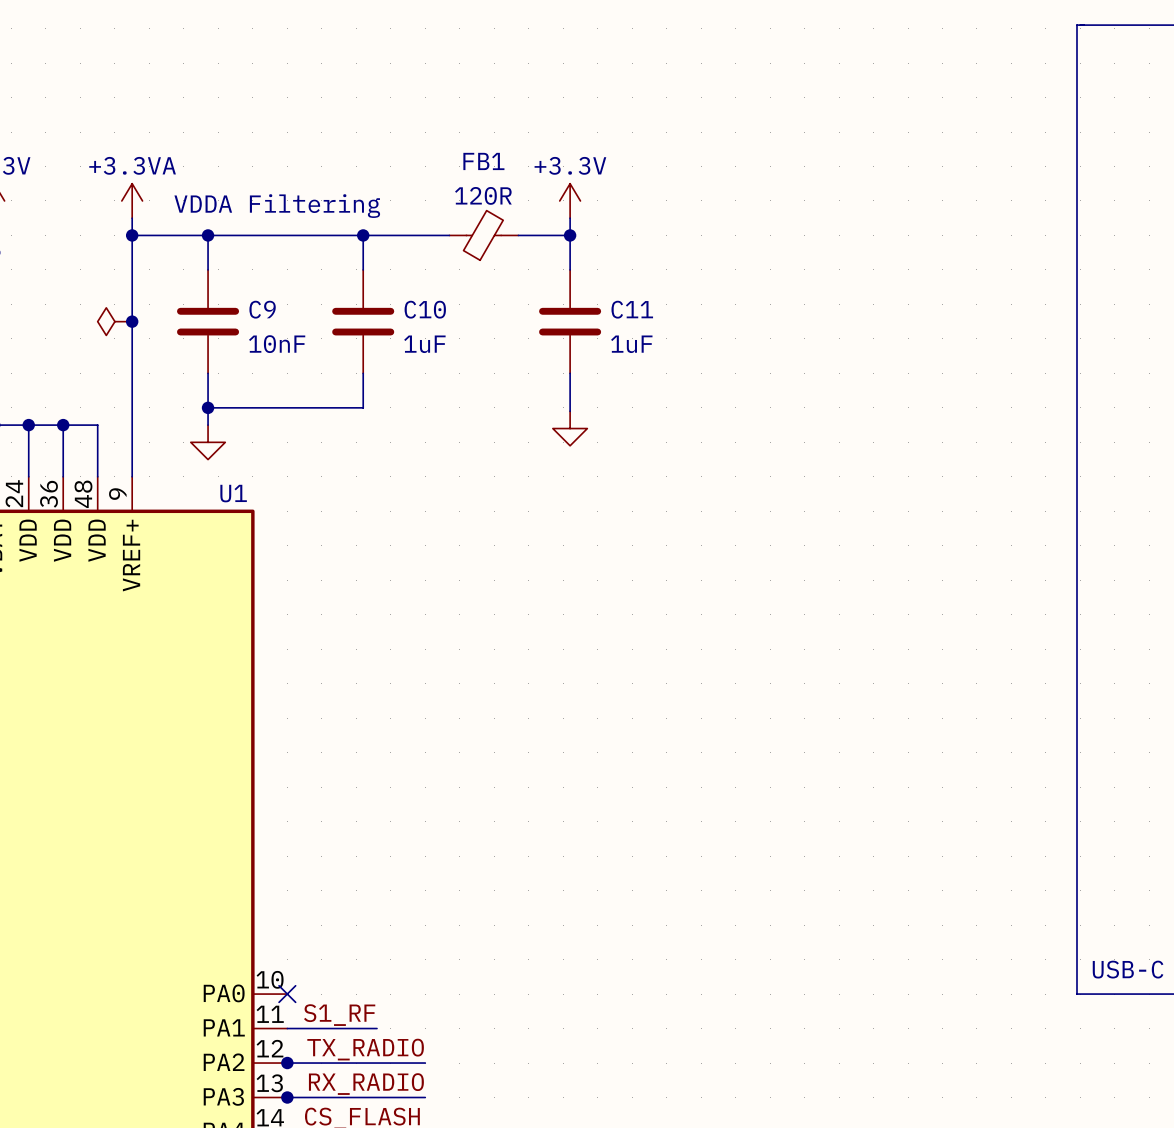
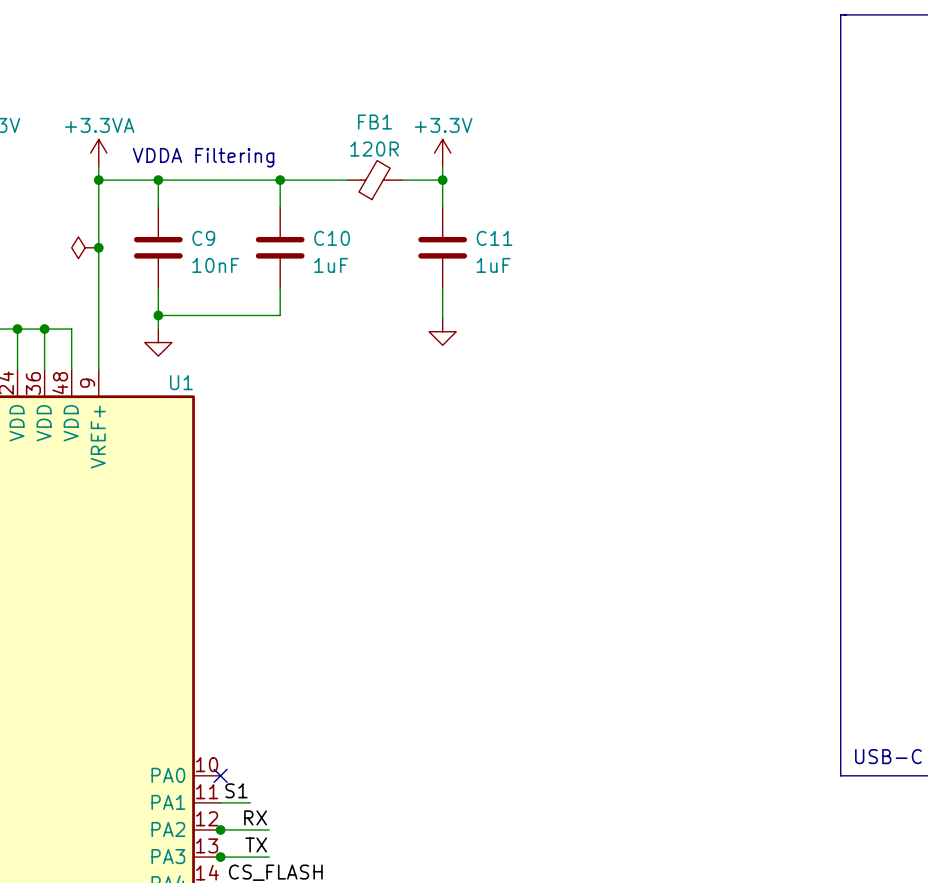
label: none -> S1 (236, 790)
label: S1_RF (339, 1015) -> none
wire: (325, 1028) (377, 1028) -> none
label: none -> RX (255, 817)
label: TX_RADIO (365, 1049) -> none
wire: (349, 1063) (425, 1063) -> none
label: none -> TX (256, 844)
label: RX_RADIO (366, 1084) -> none
wire: (349, 1097) (425, 1097) -> none

